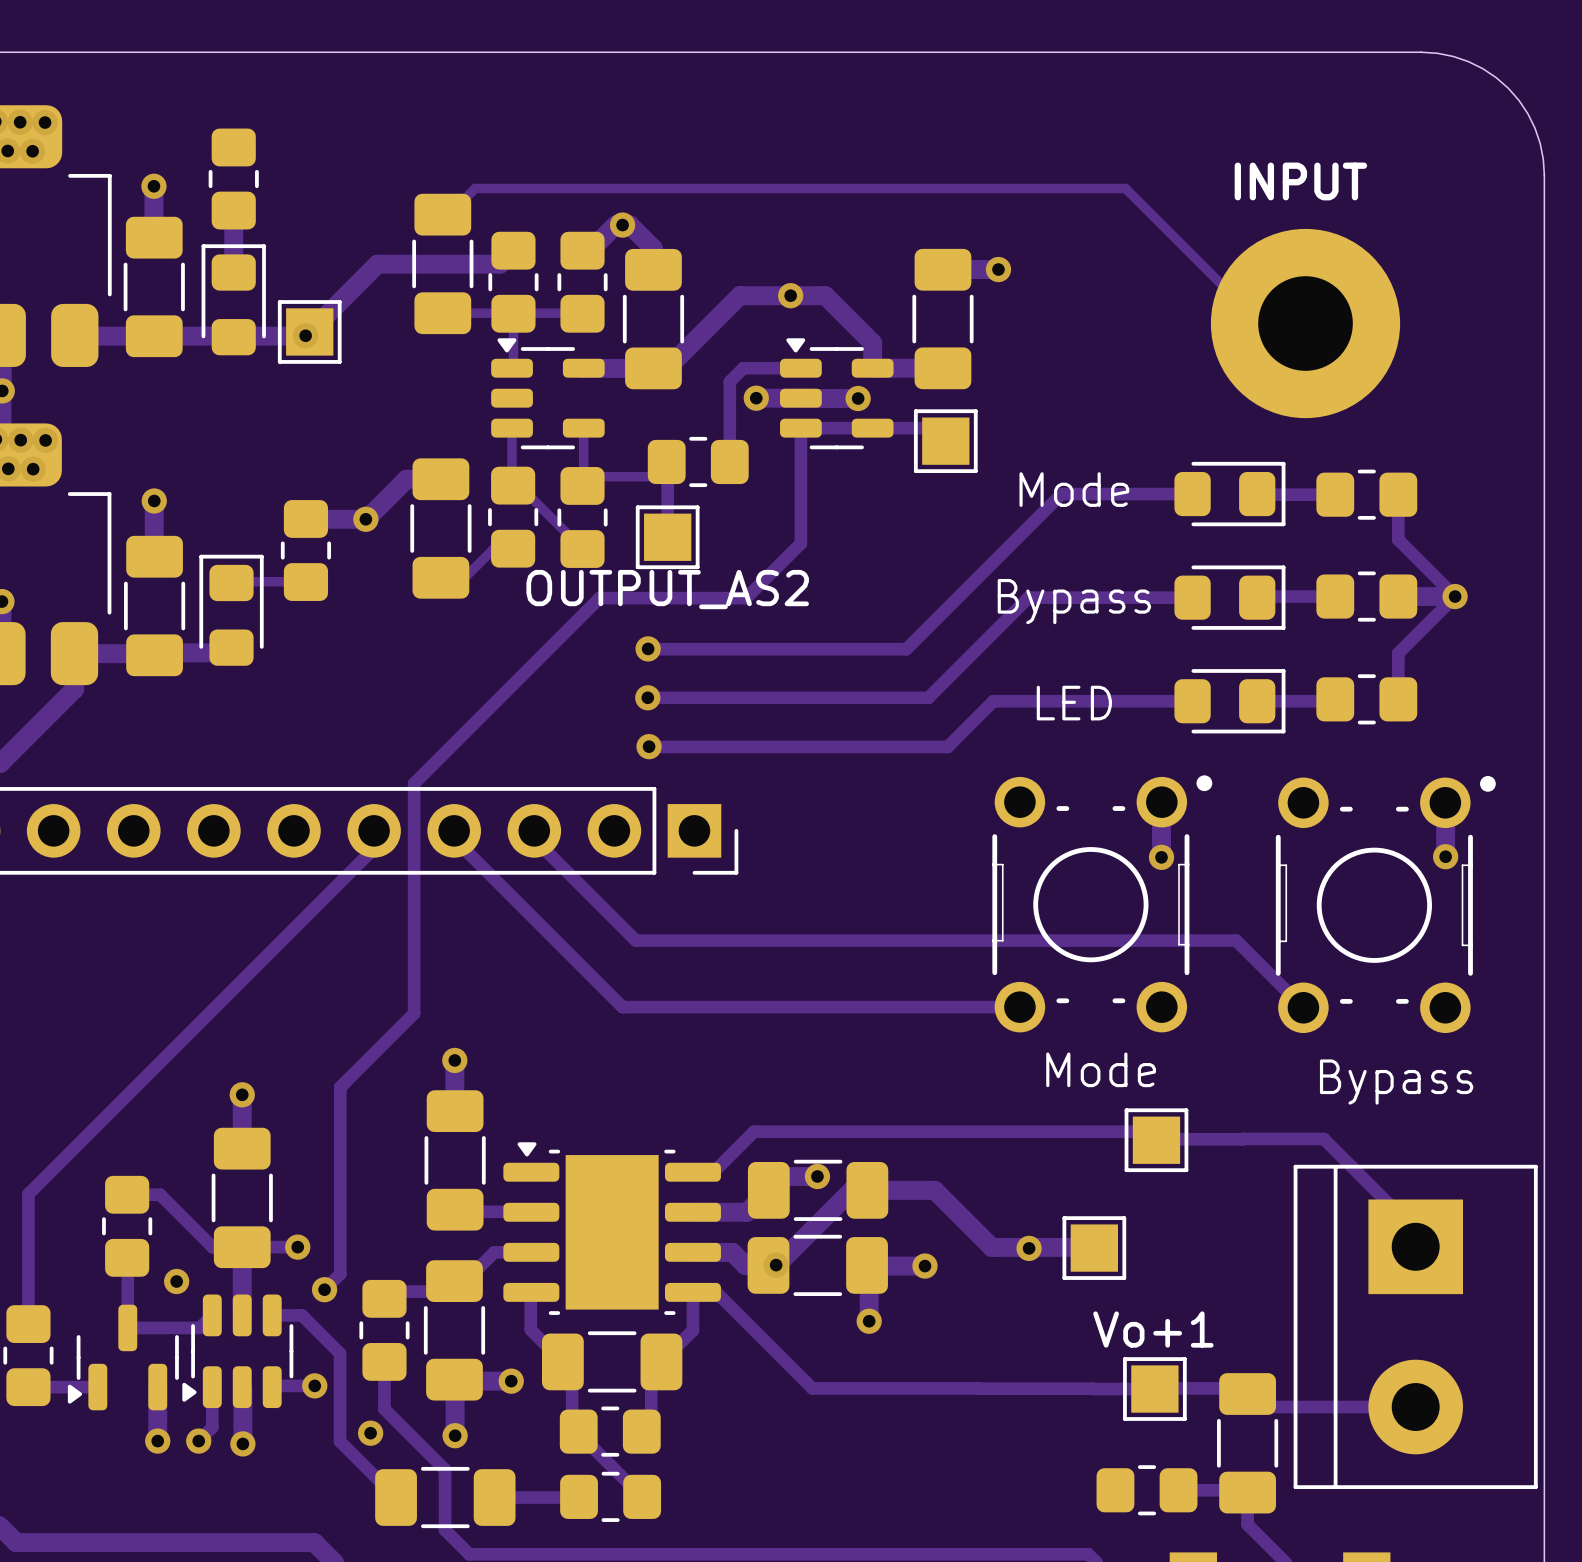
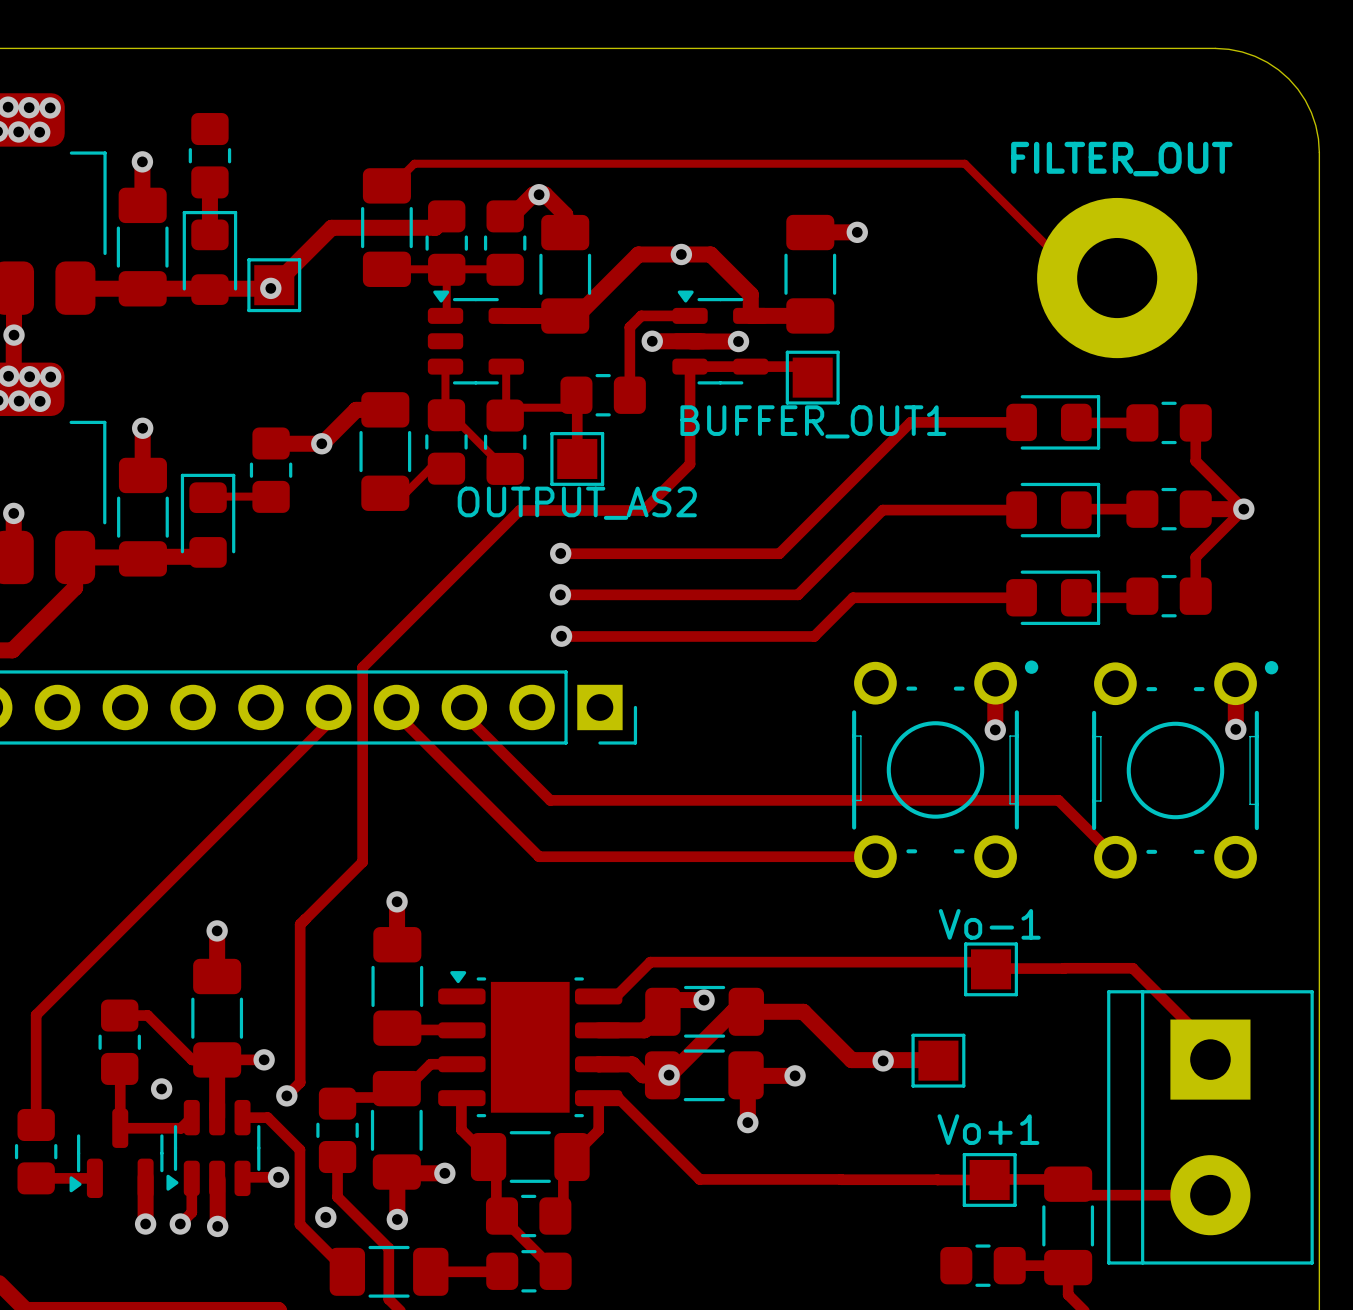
text: INPUT (1300, 181) -> none
text: none -> FILTER_OUT (1121, 159)
text: Mode (1074, 489) -> none
BUFFER_OUT1 name: none -> BUFFER_OUT1 (813, 421)
text: Bypass (1074, 601) -> none
text: LED (1074, 703) -> none
text: Mode (1101, 1069) -> none
text: Bypass (1396, 1082) -> none
Vo-1 name: none -> Vo-1 (989, 924)

